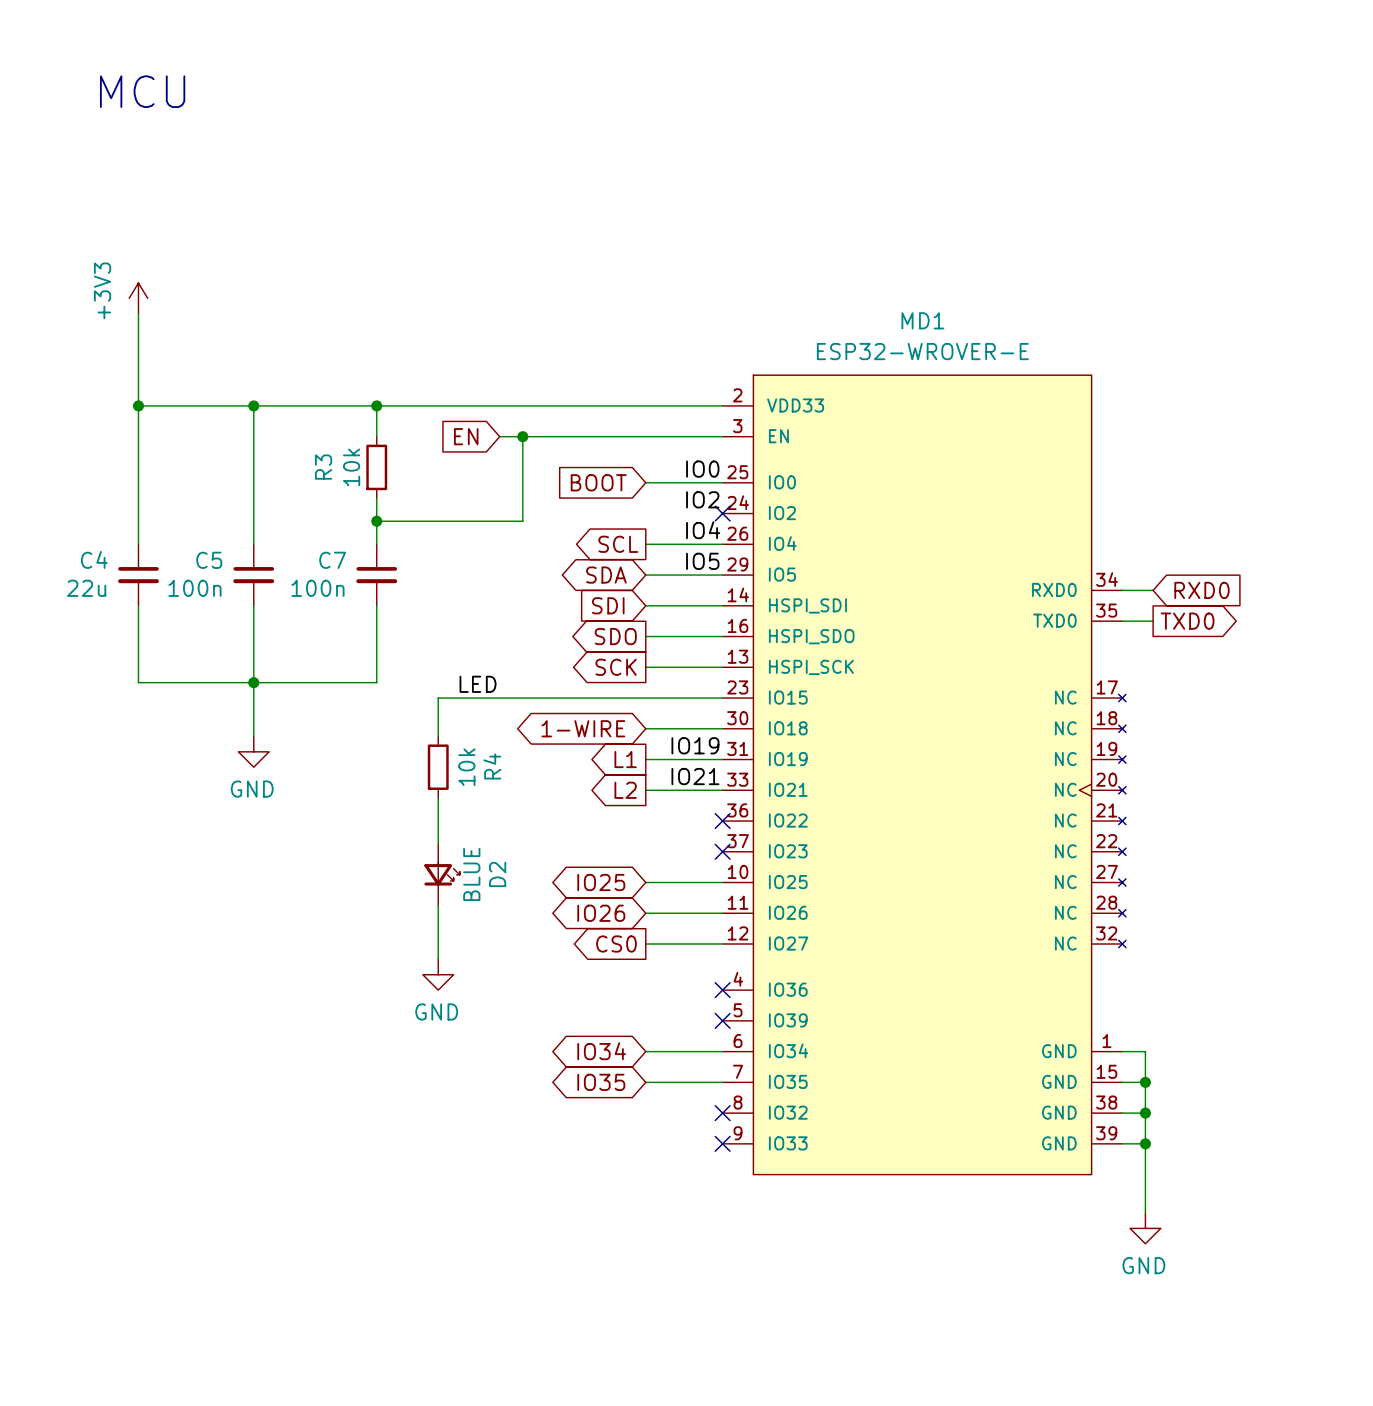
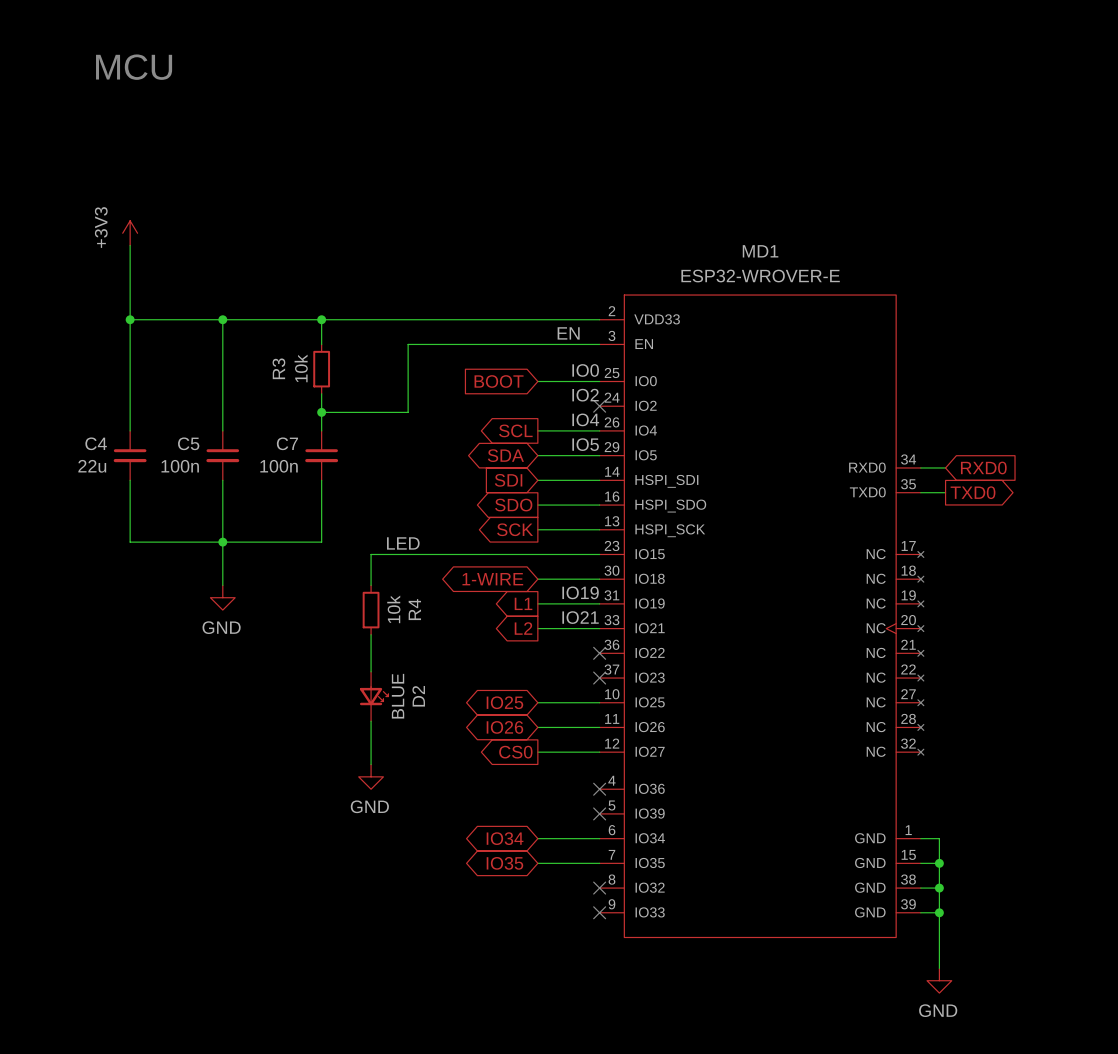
label: none -> EN (568, 333)
global label: EN (466, 436) -> none
wire: (522, 436) (522, 521) (484, 521) -> (420, 344) (408, 344) (408, 412)
junction: (522, 436) -> none

